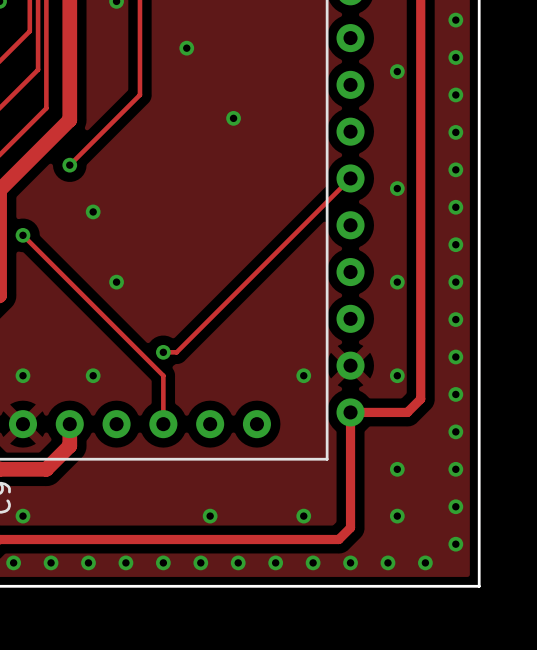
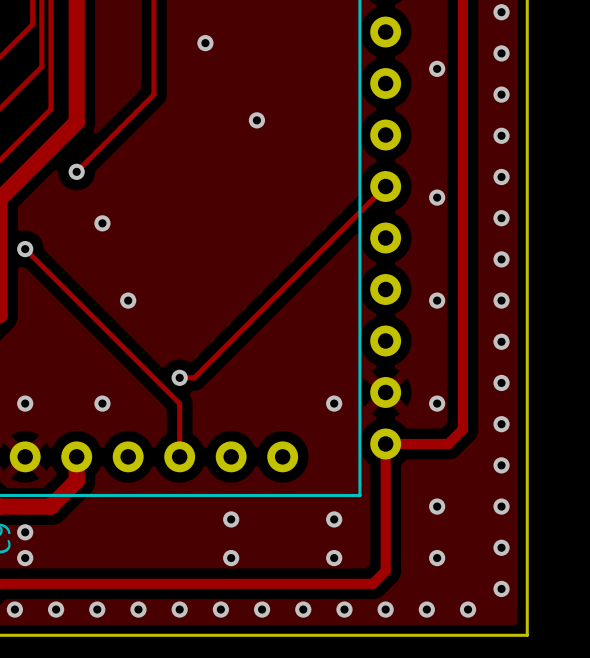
via: none -> (231, 519)
via: none -> (334, 519)
via: none -> (25, 532)

